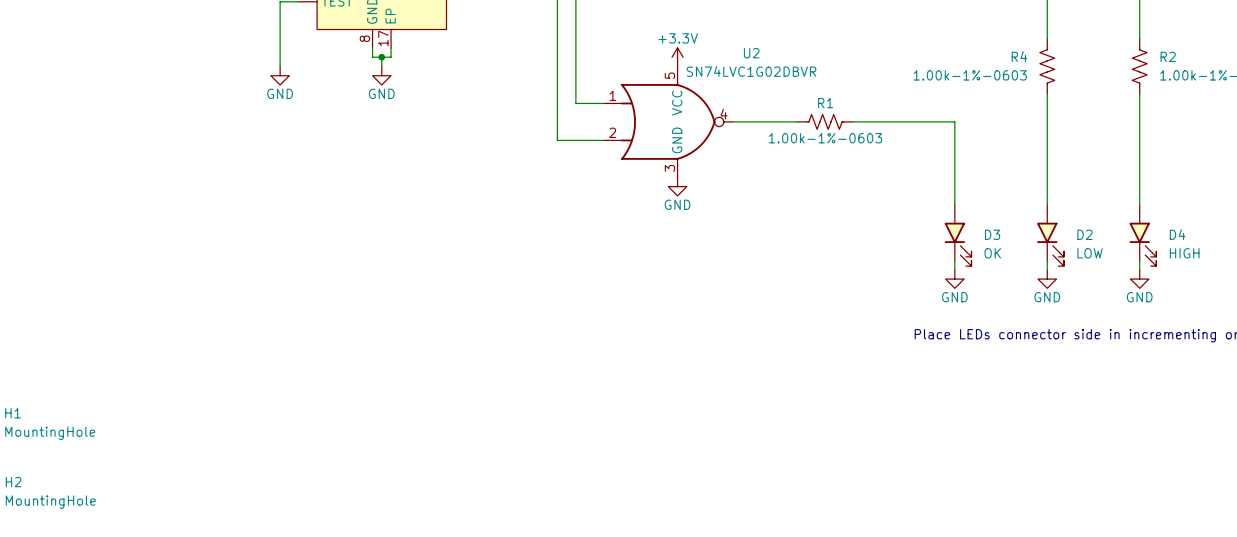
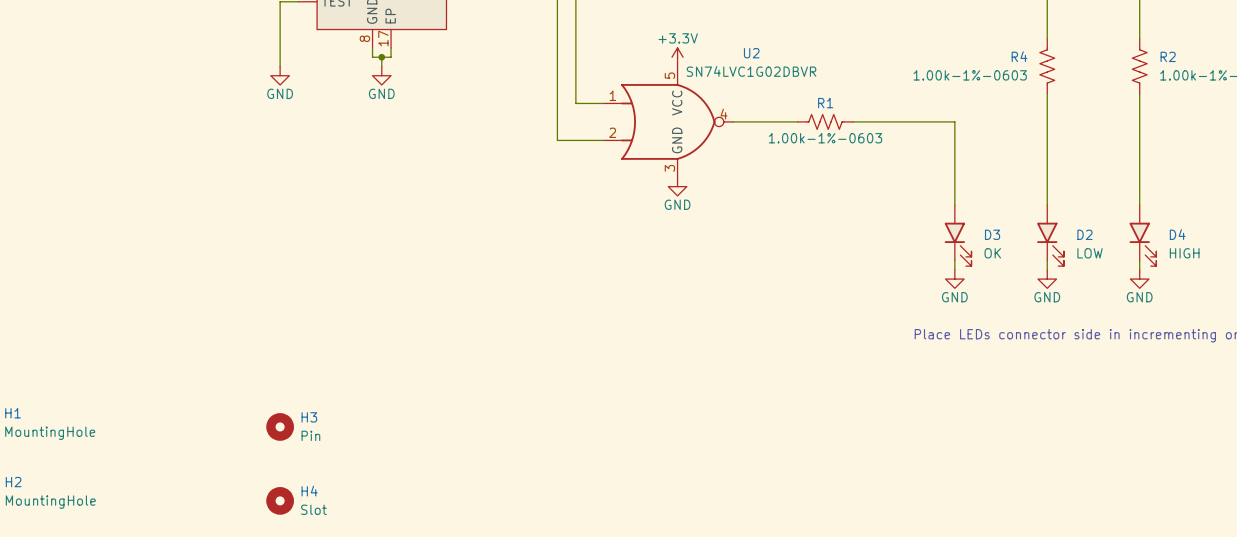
H3: none -> Pin (280, 426)
H4: none -> Slot (280, 500)

